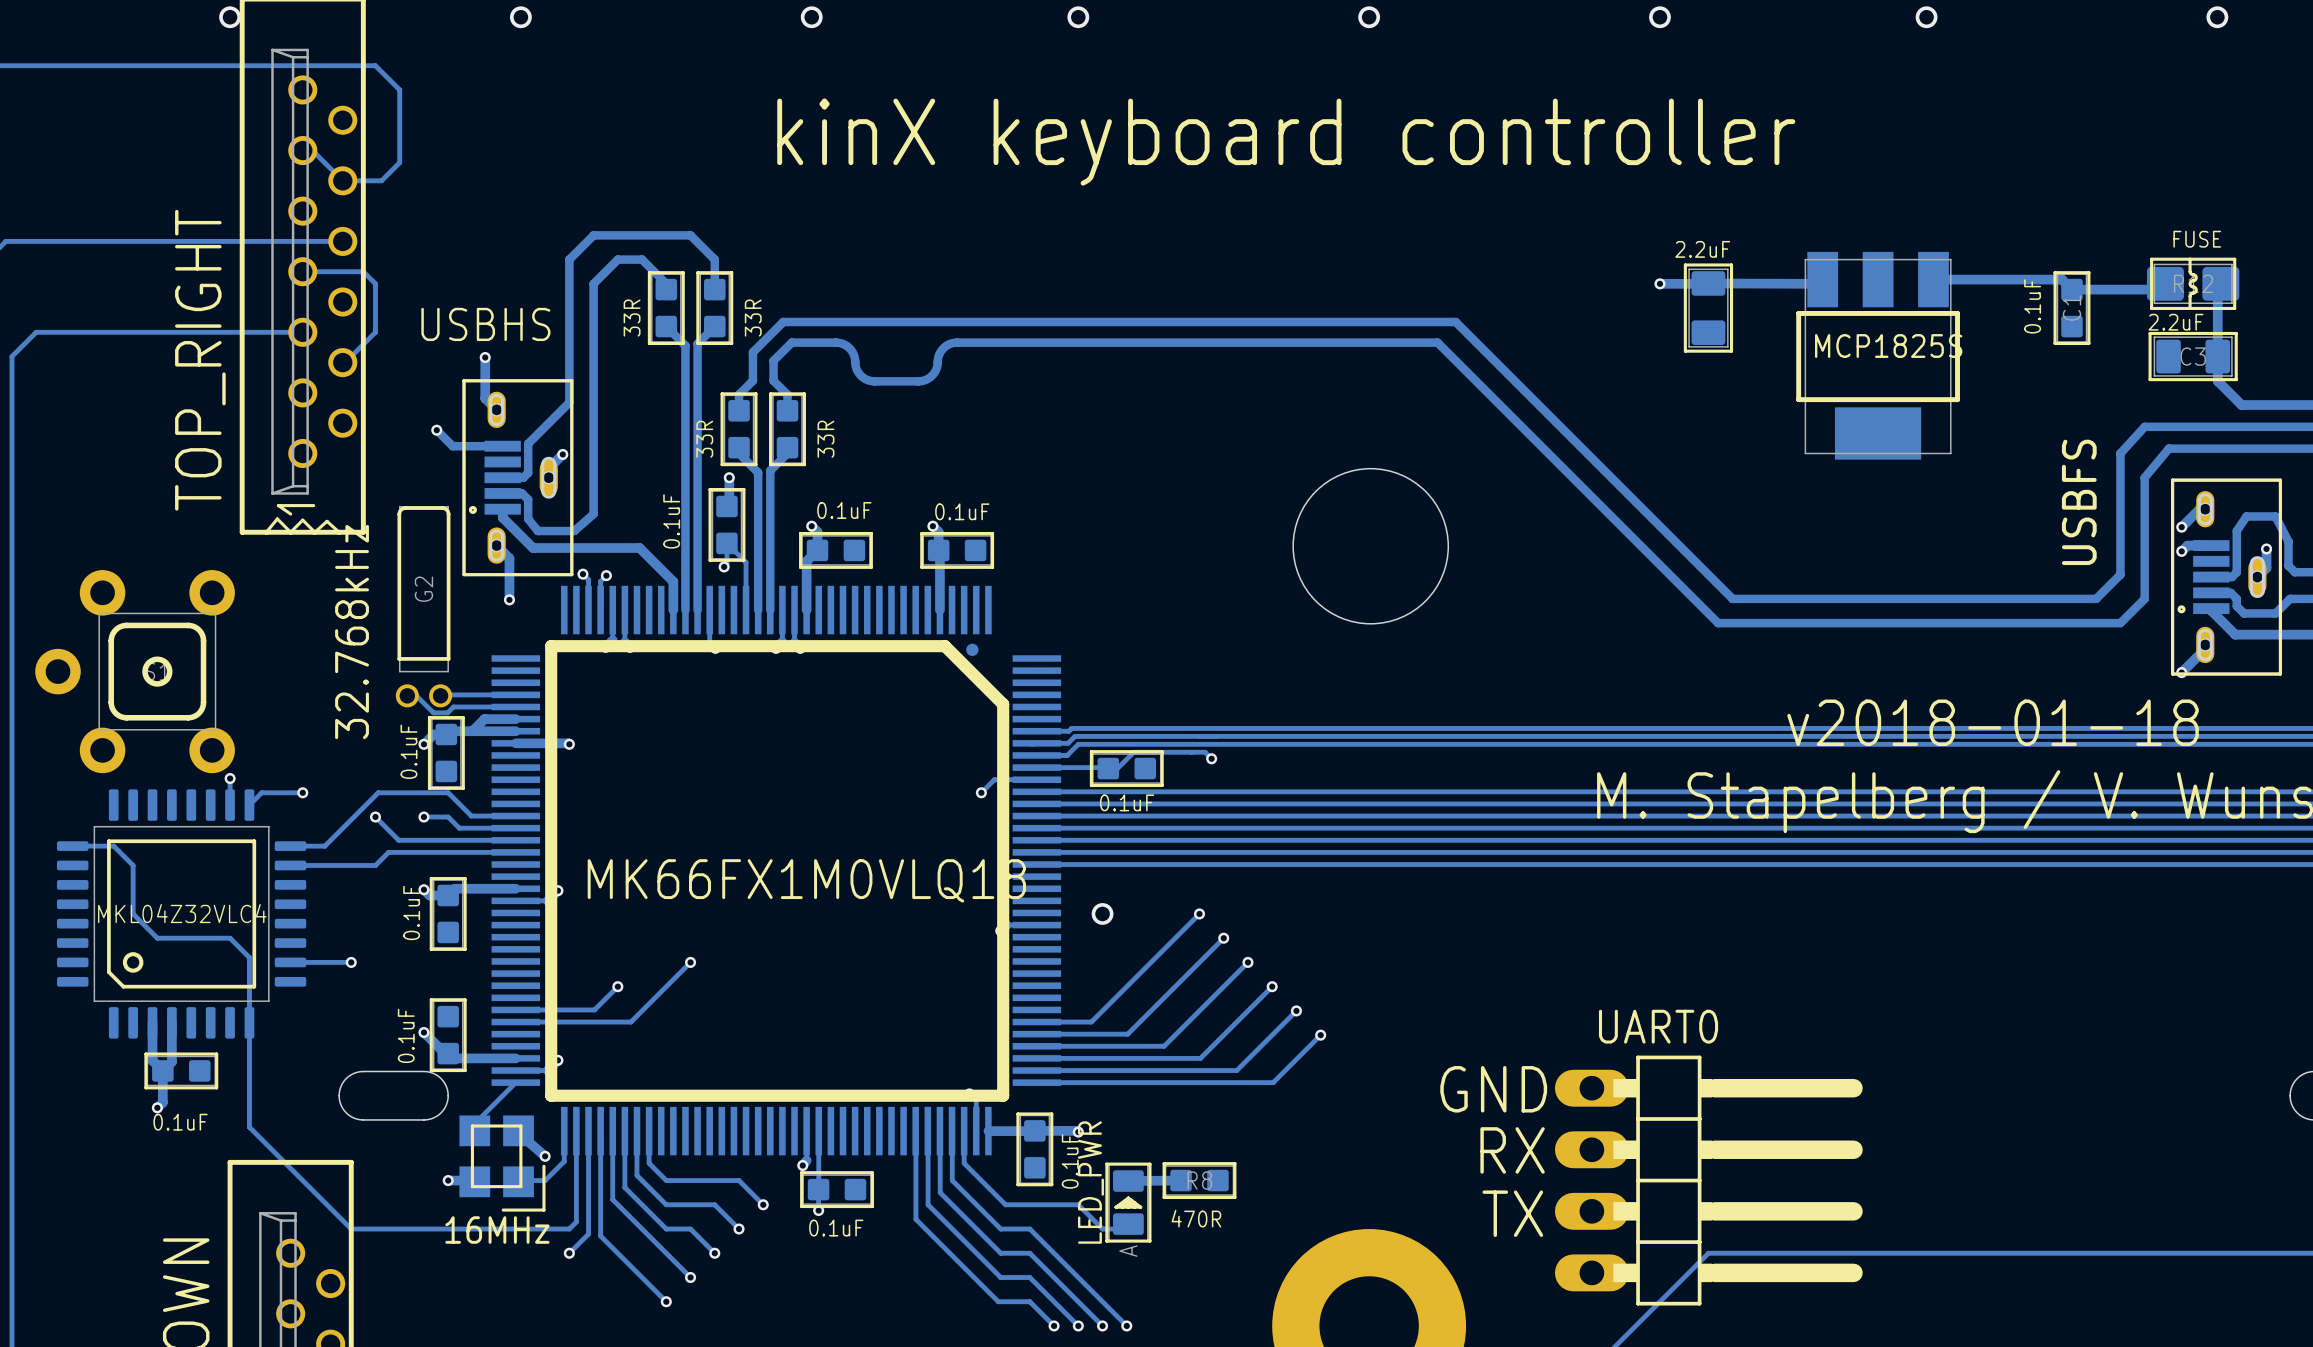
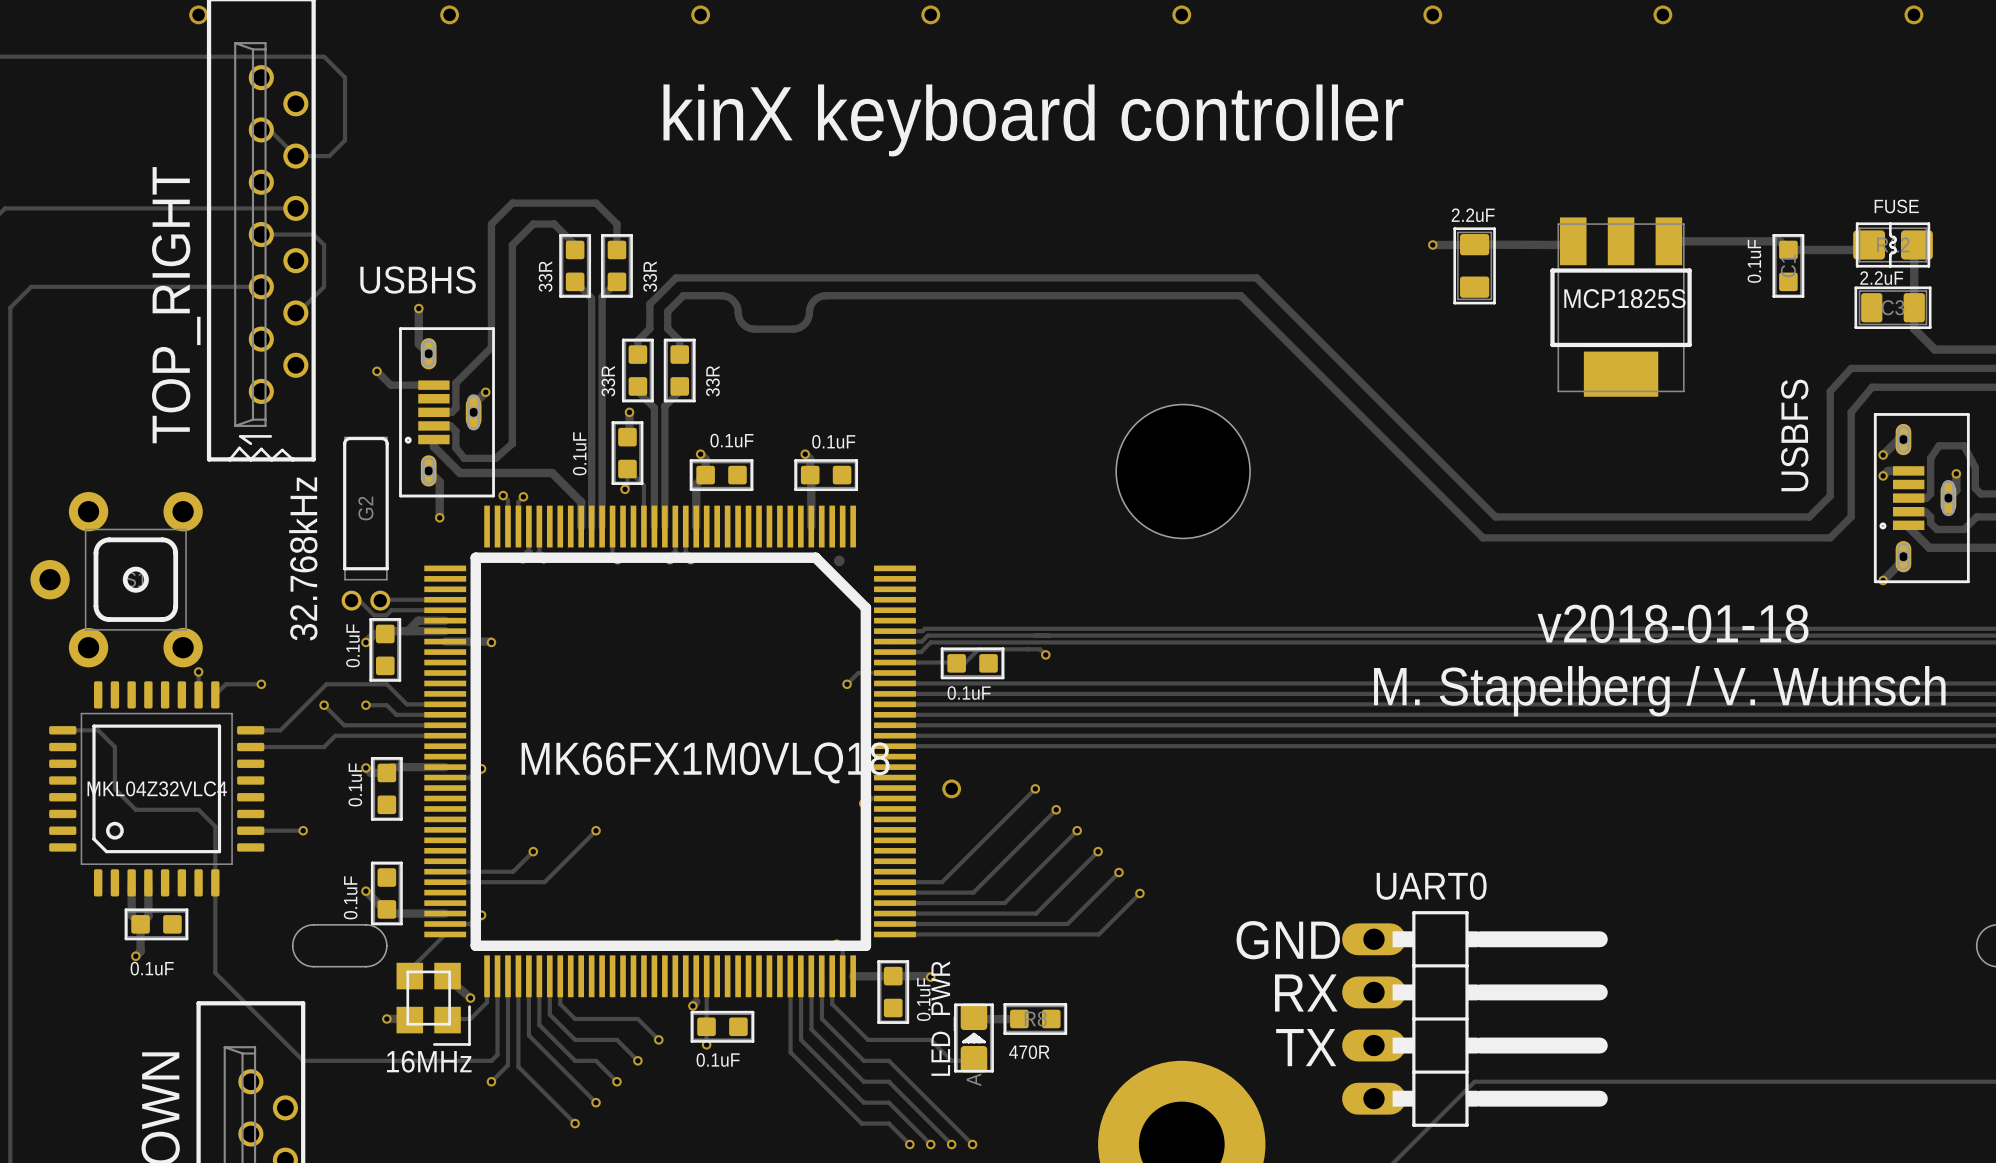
LED_PWR footprint: [1105, 1162, 1152, 1243] -> [954, 1003, 994, 1073]

